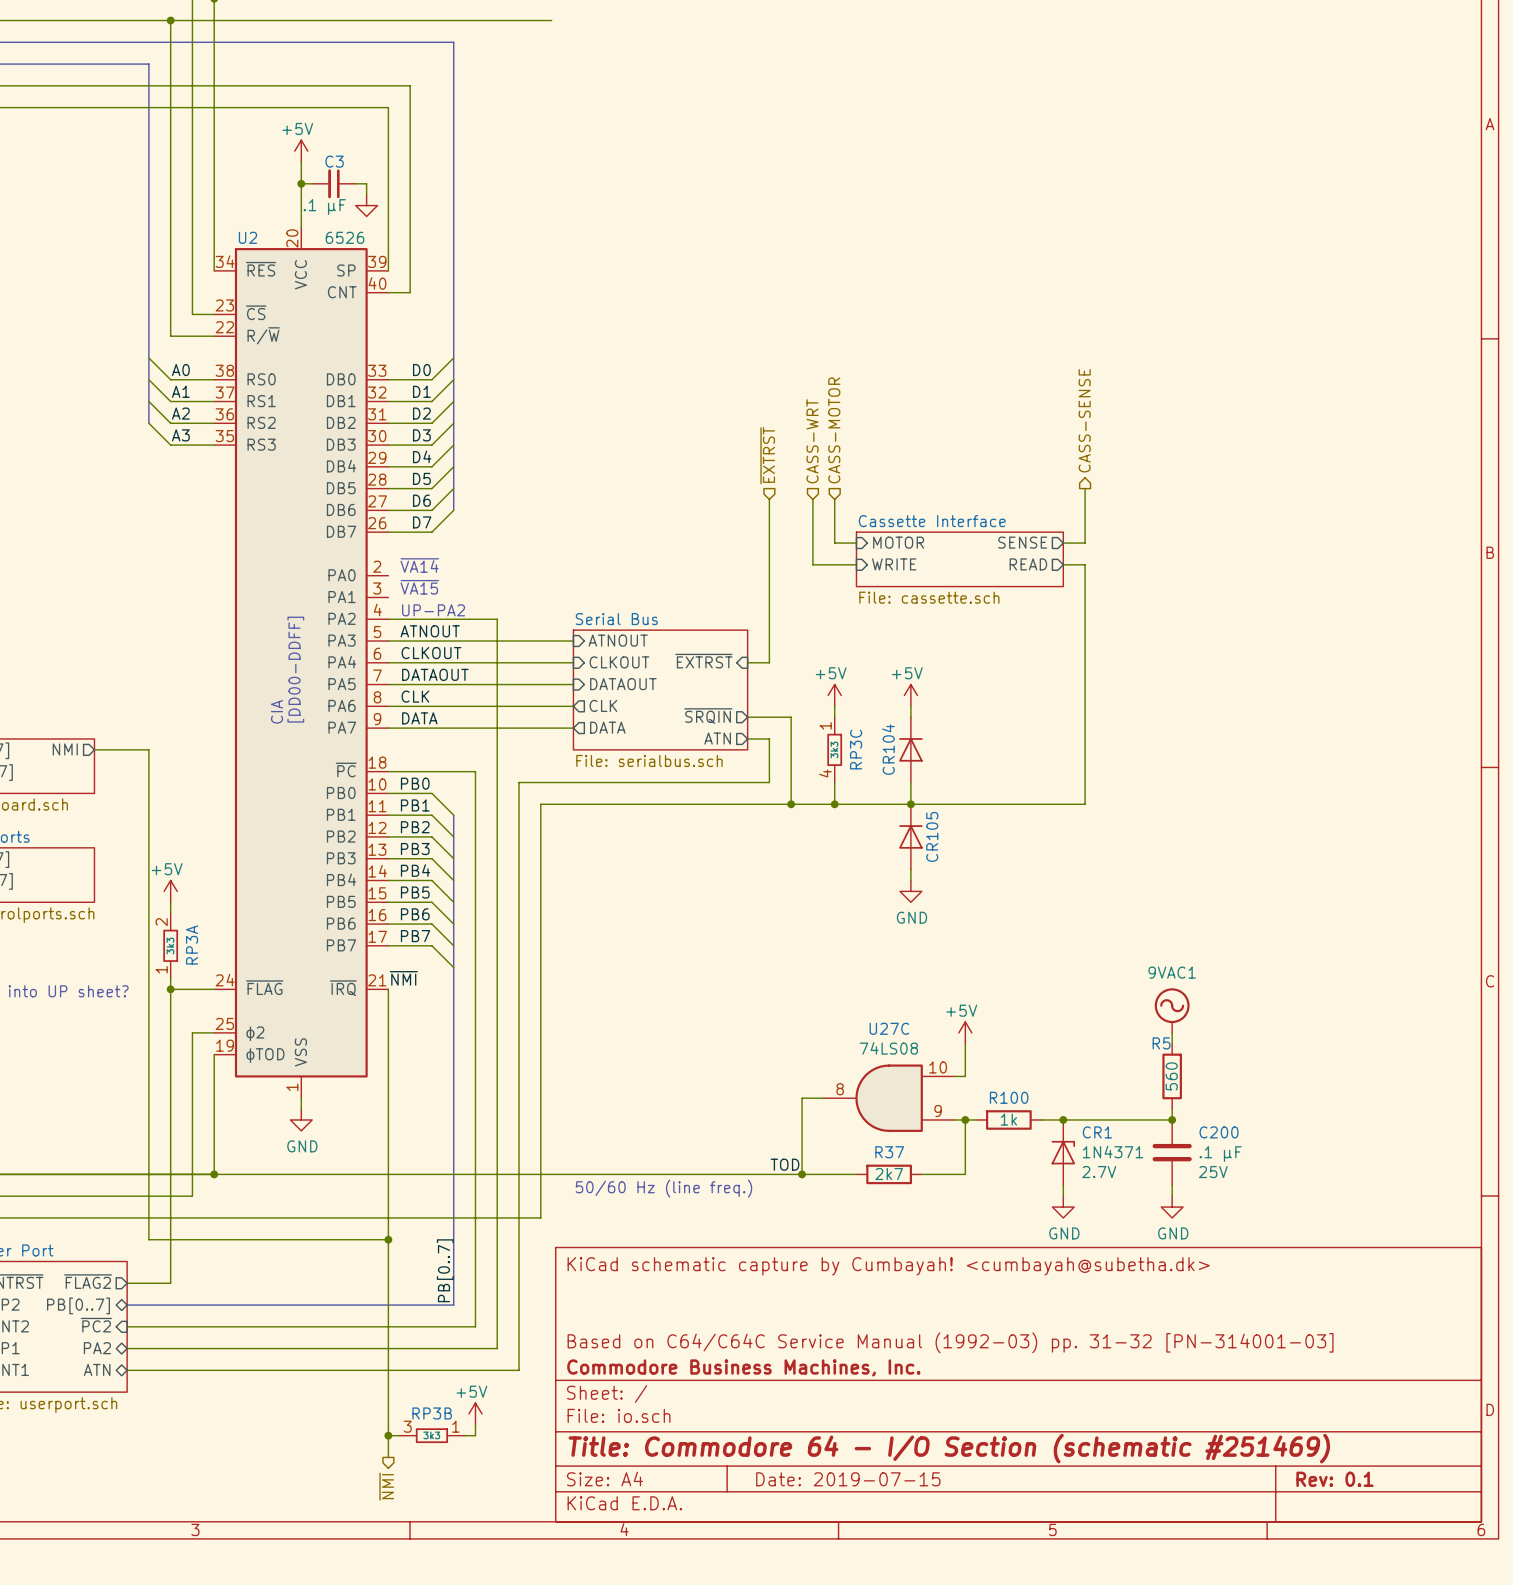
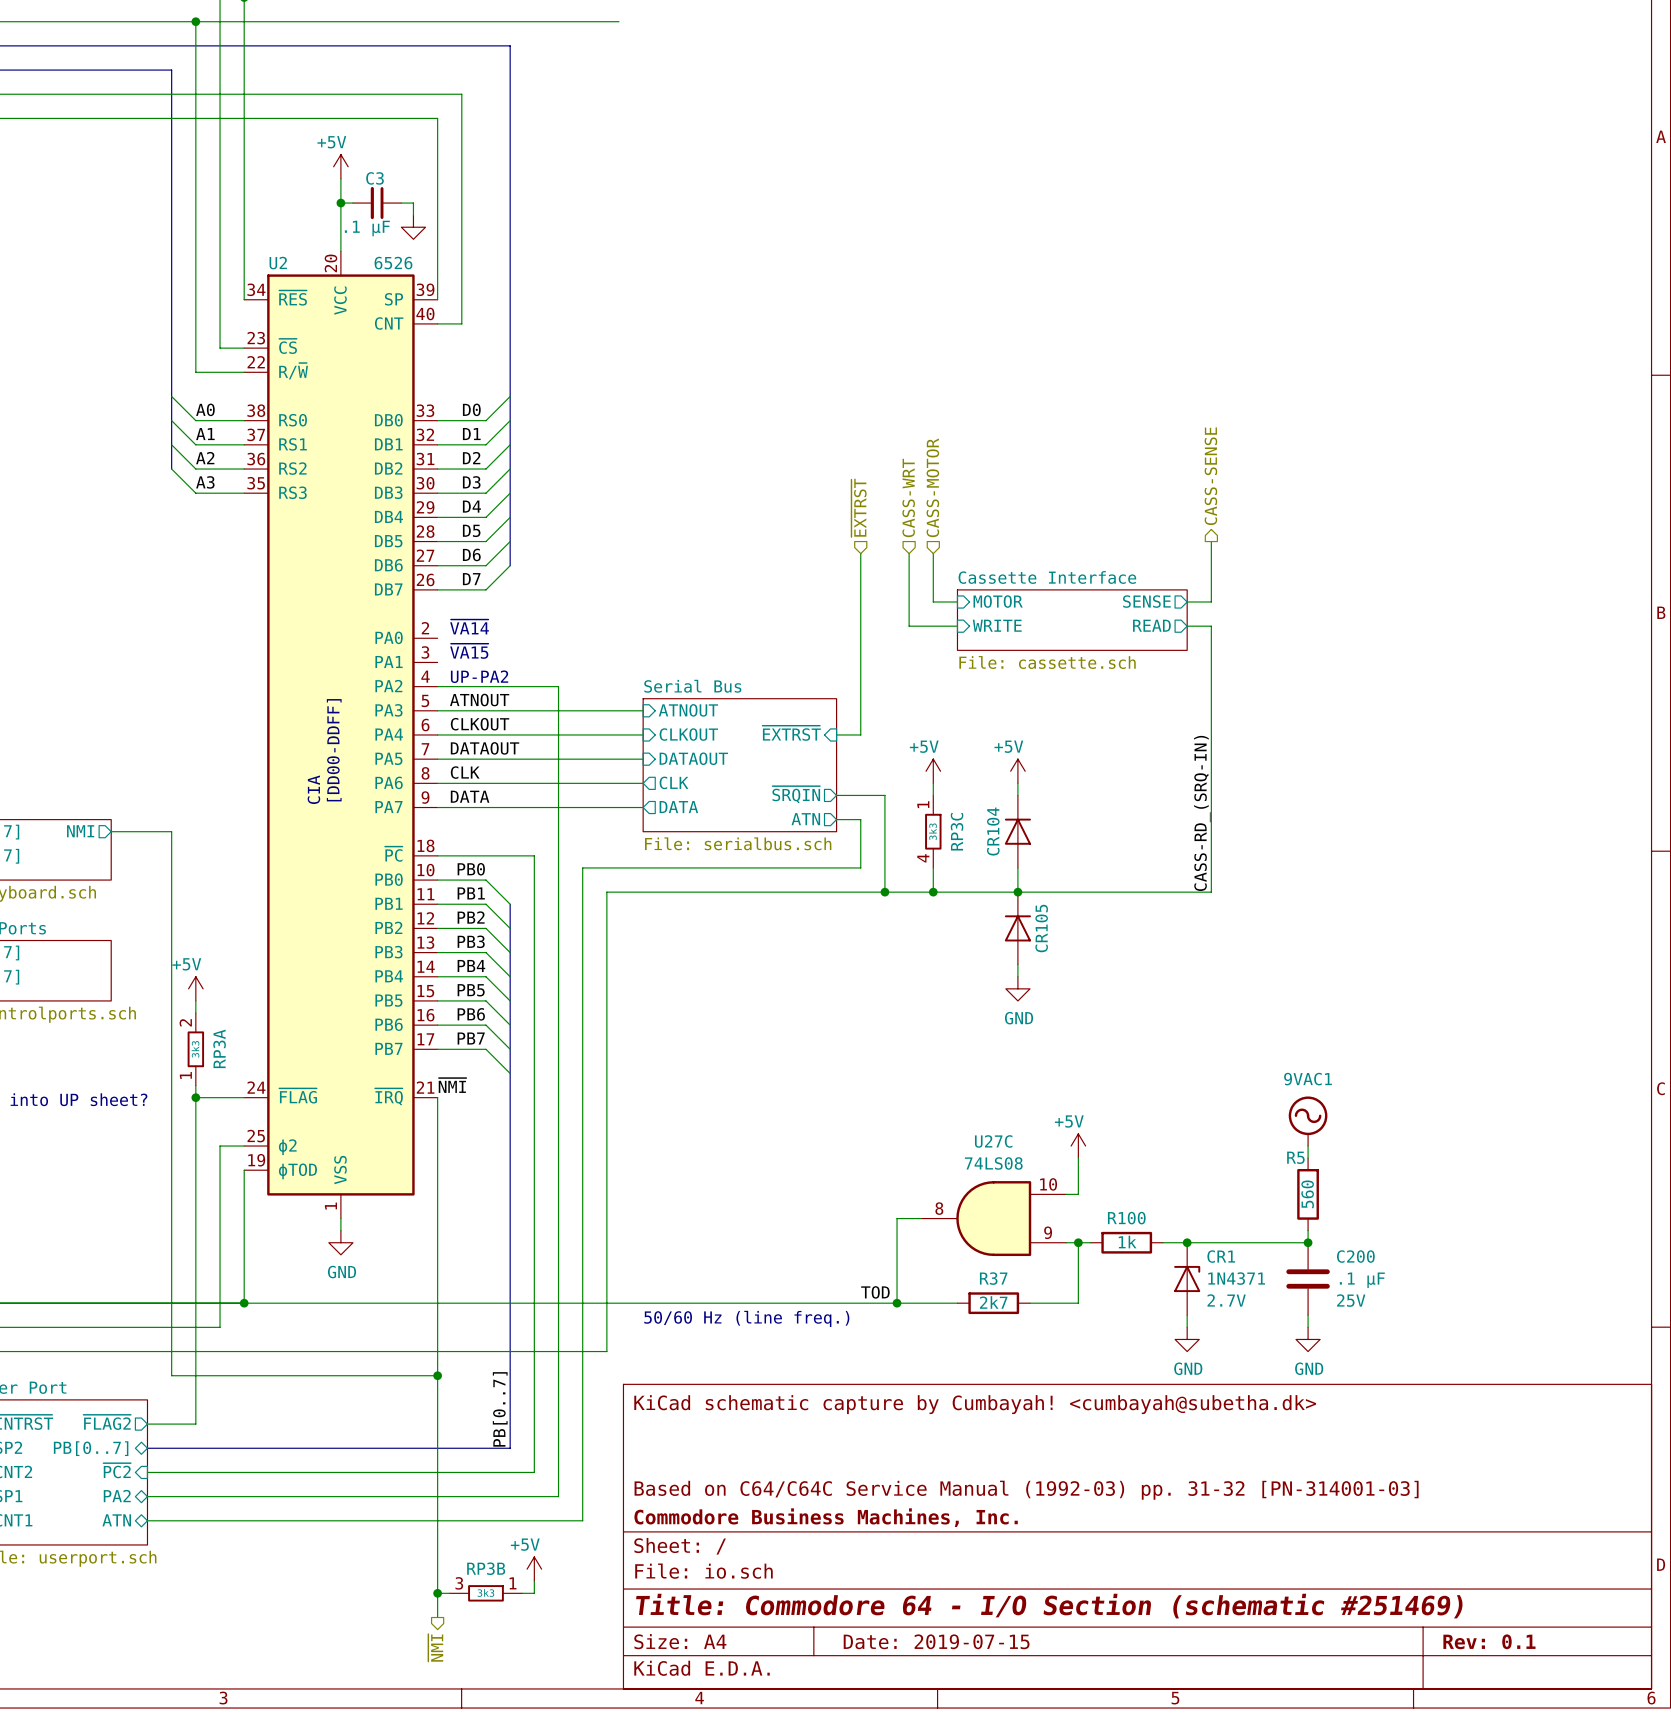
label: none -> CASS-RD_(SRQ-IN) (1202, 813)

